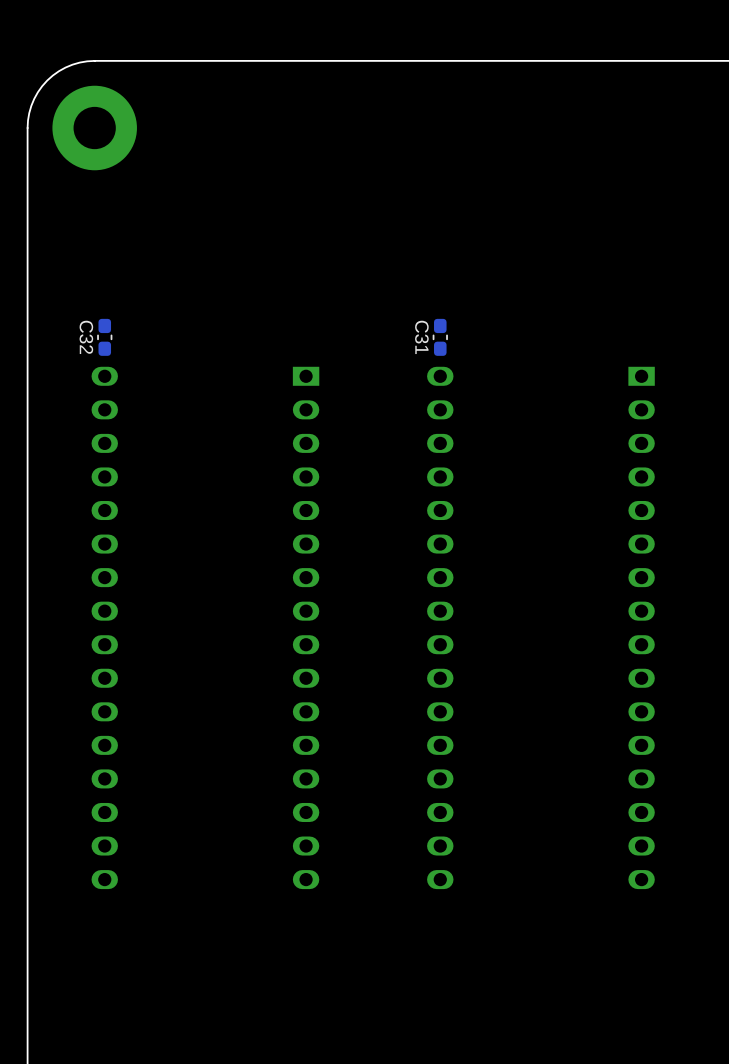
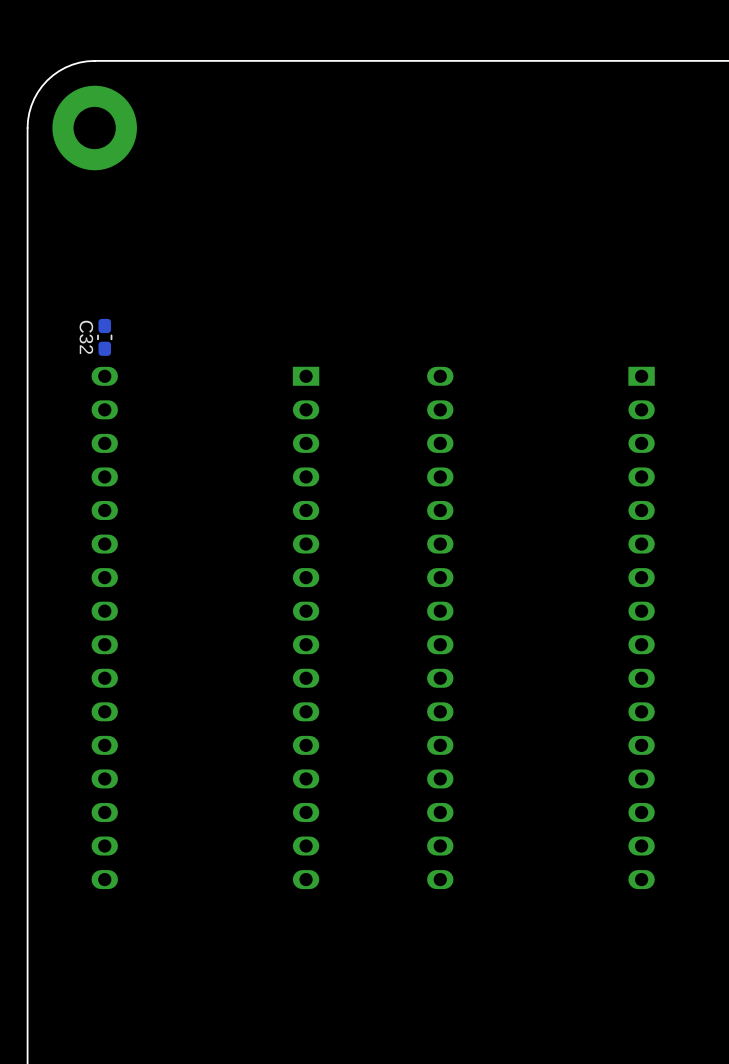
C31: (440, 337) -> none

